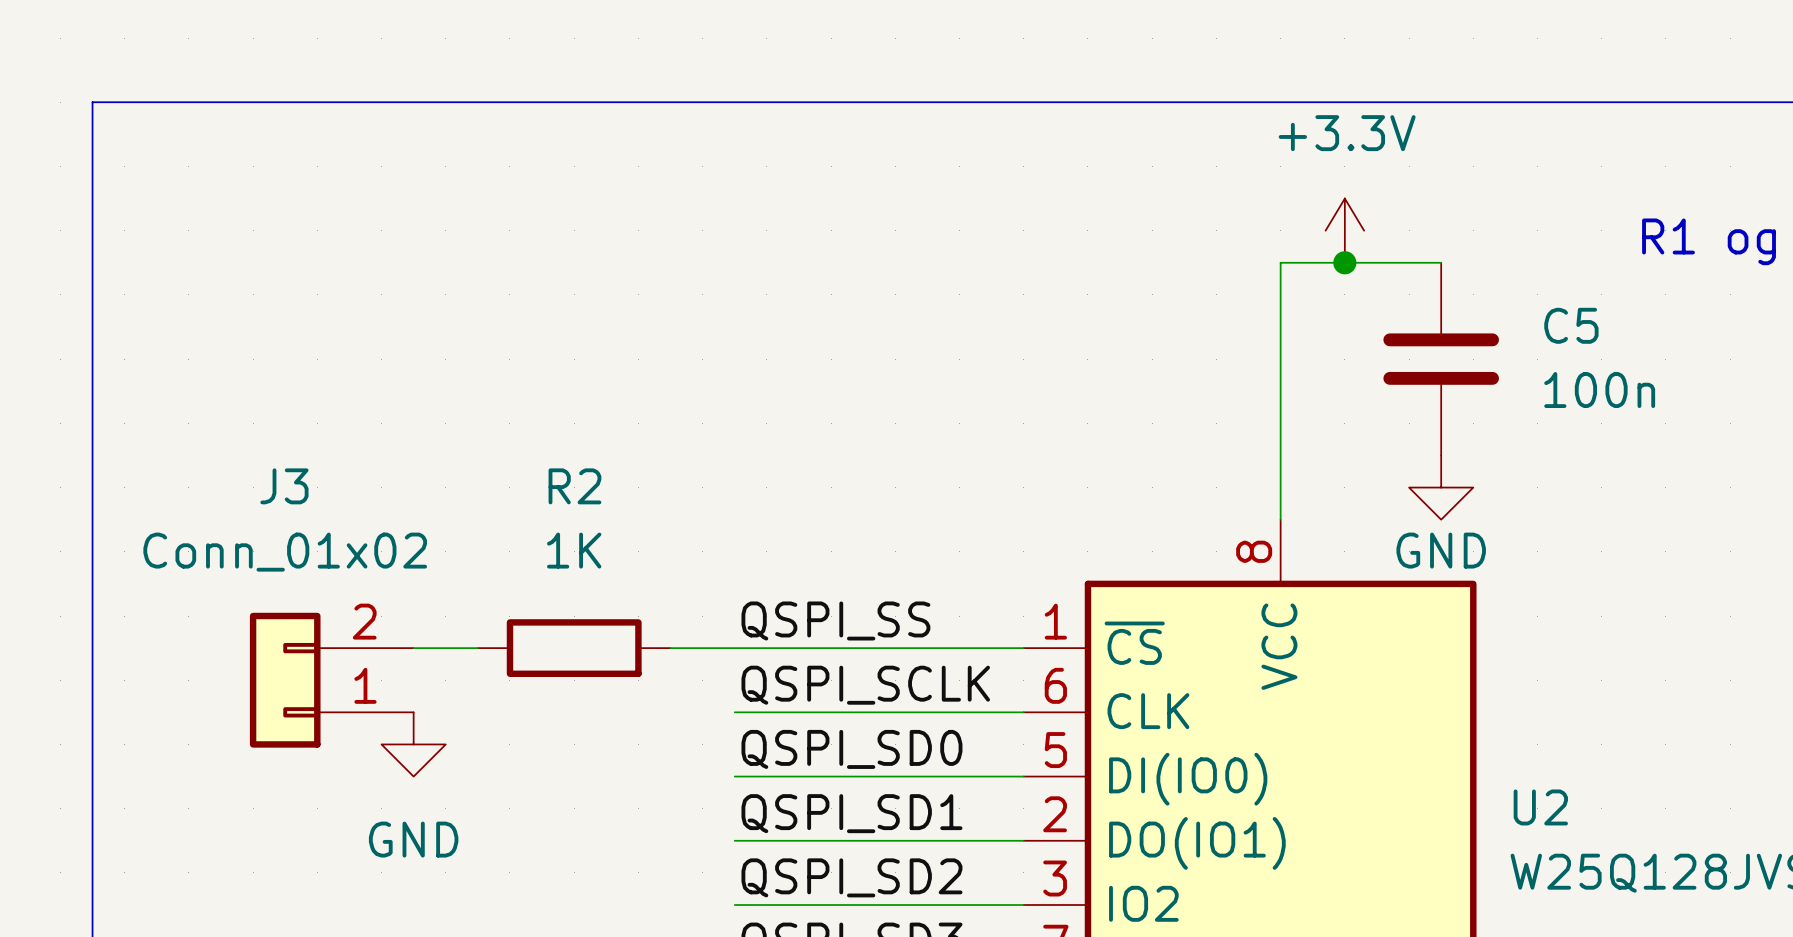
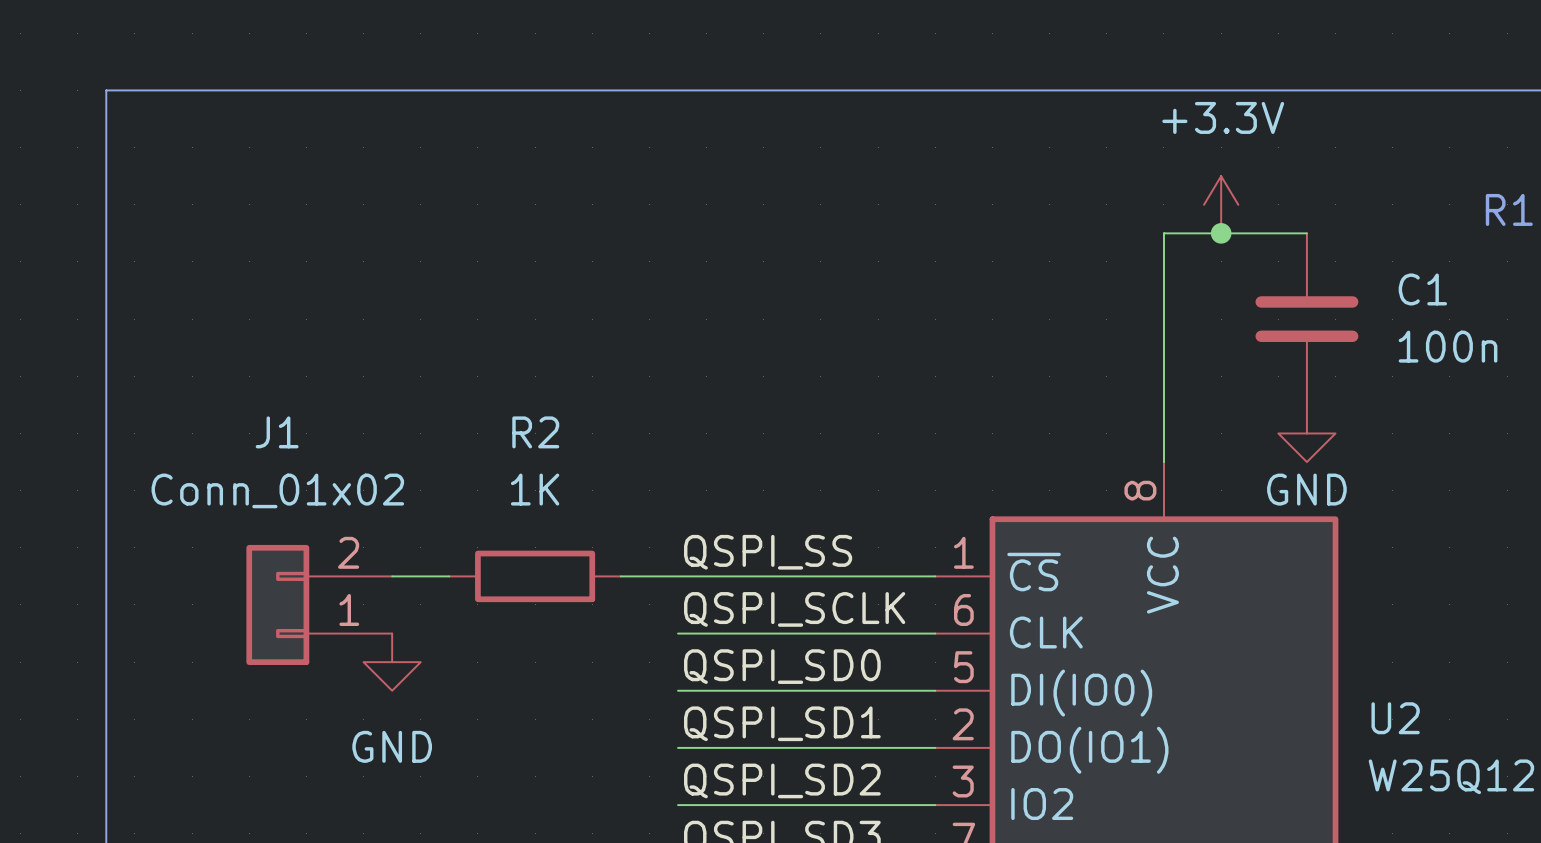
C5 name: C5 (1571, 325) -> C1 (1422, 289)
J3 name: J3 (284, 486) -> J1 (277, 432)

